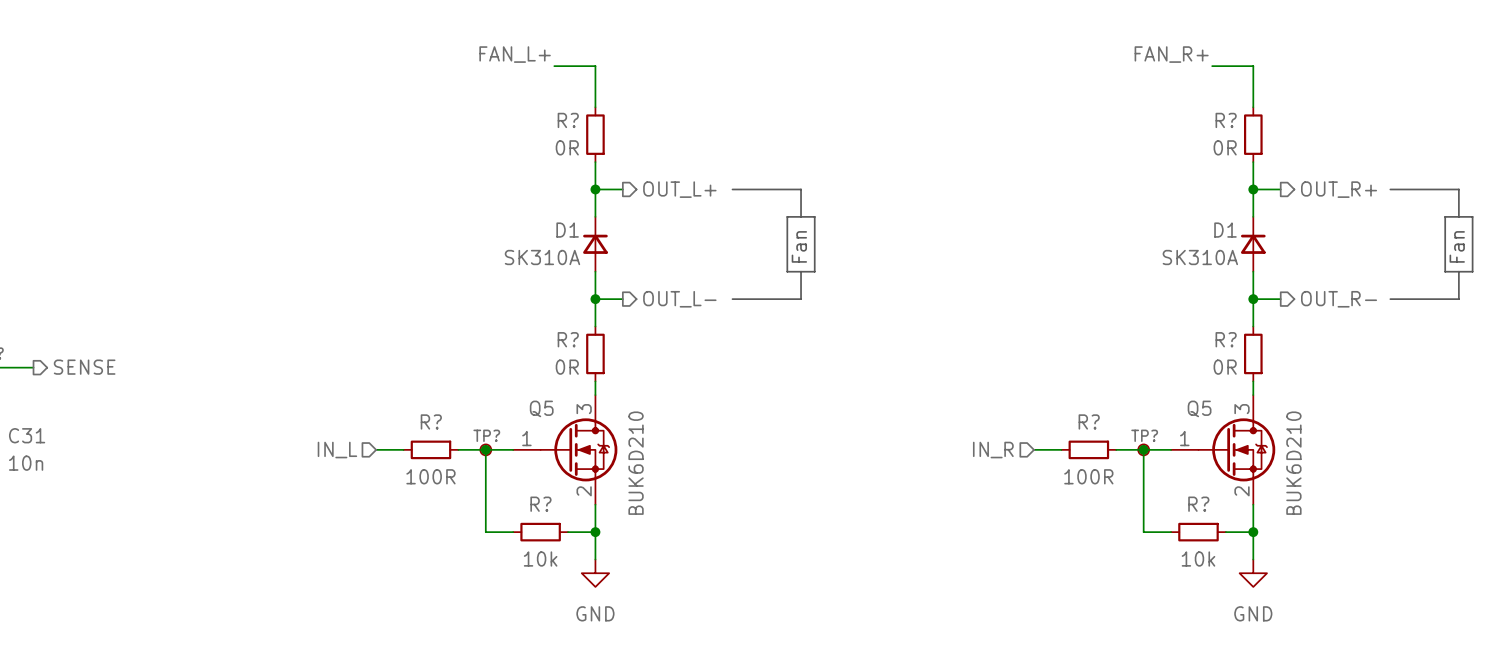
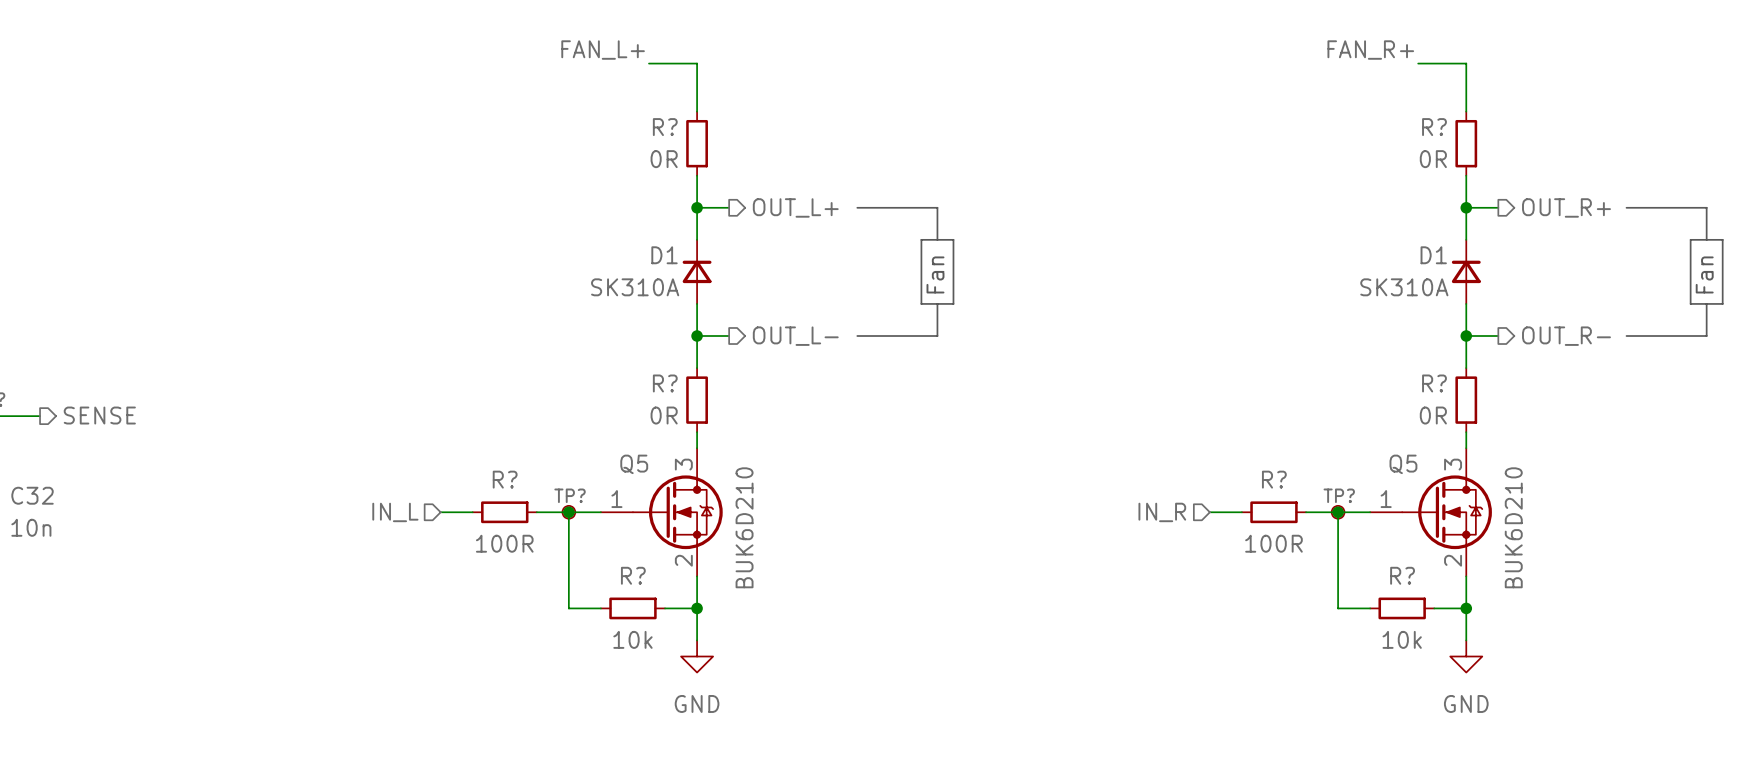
C31 name: C31 (27, 435) -> C32 (32, 495)

